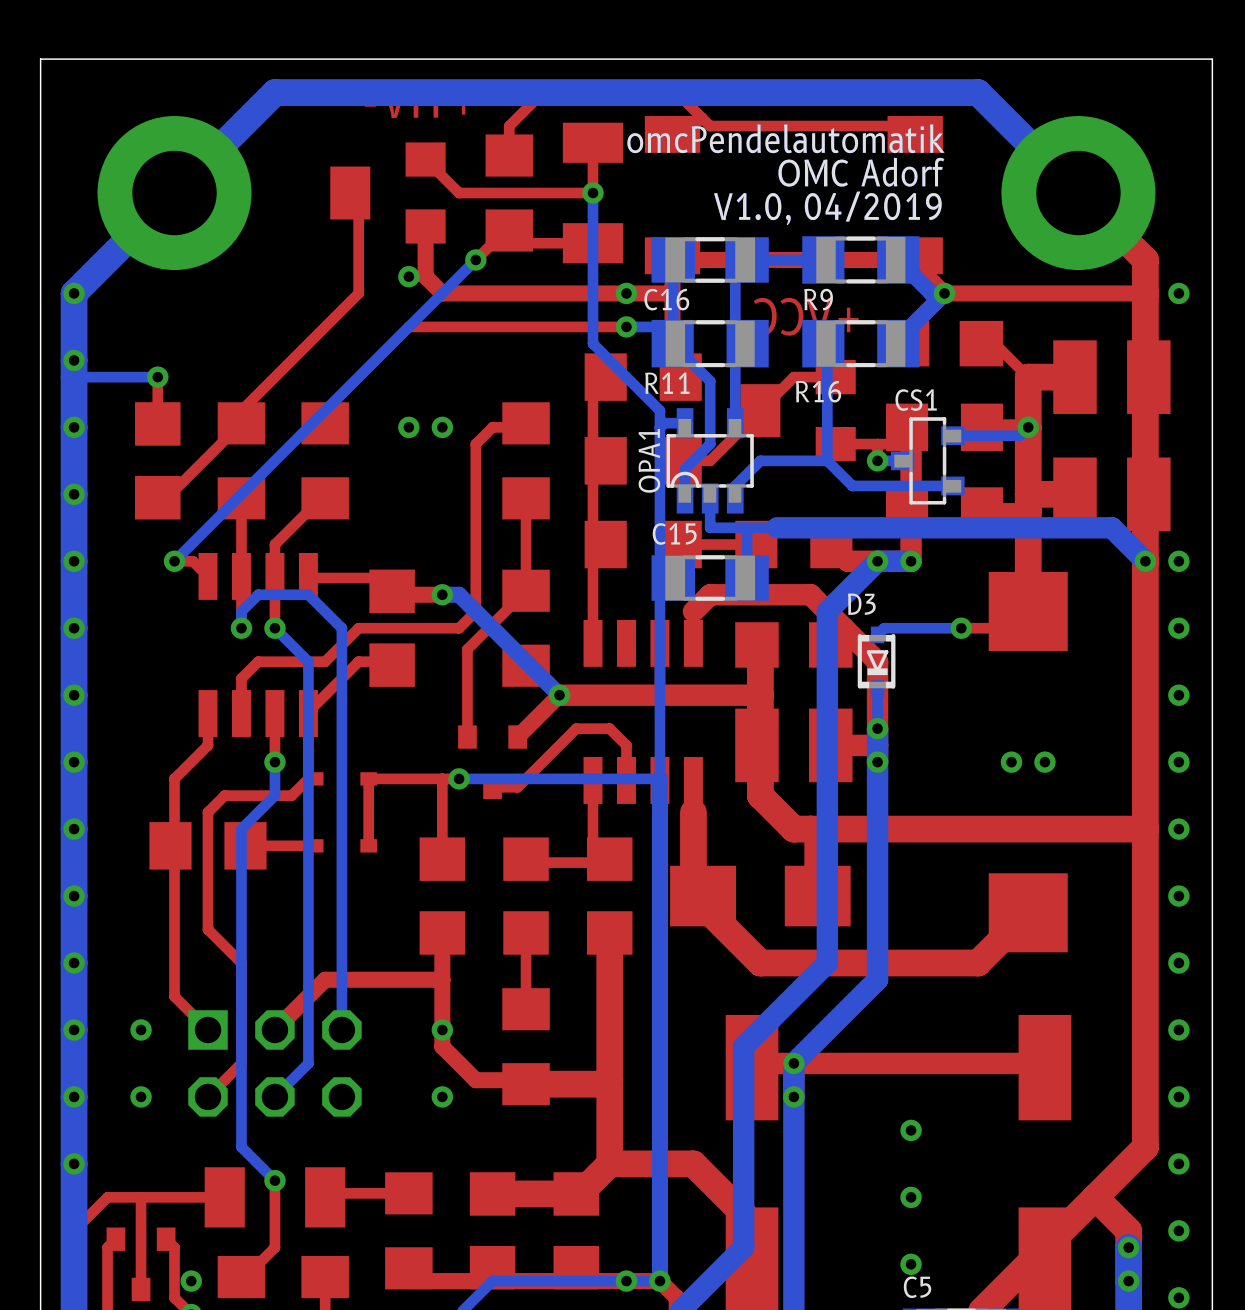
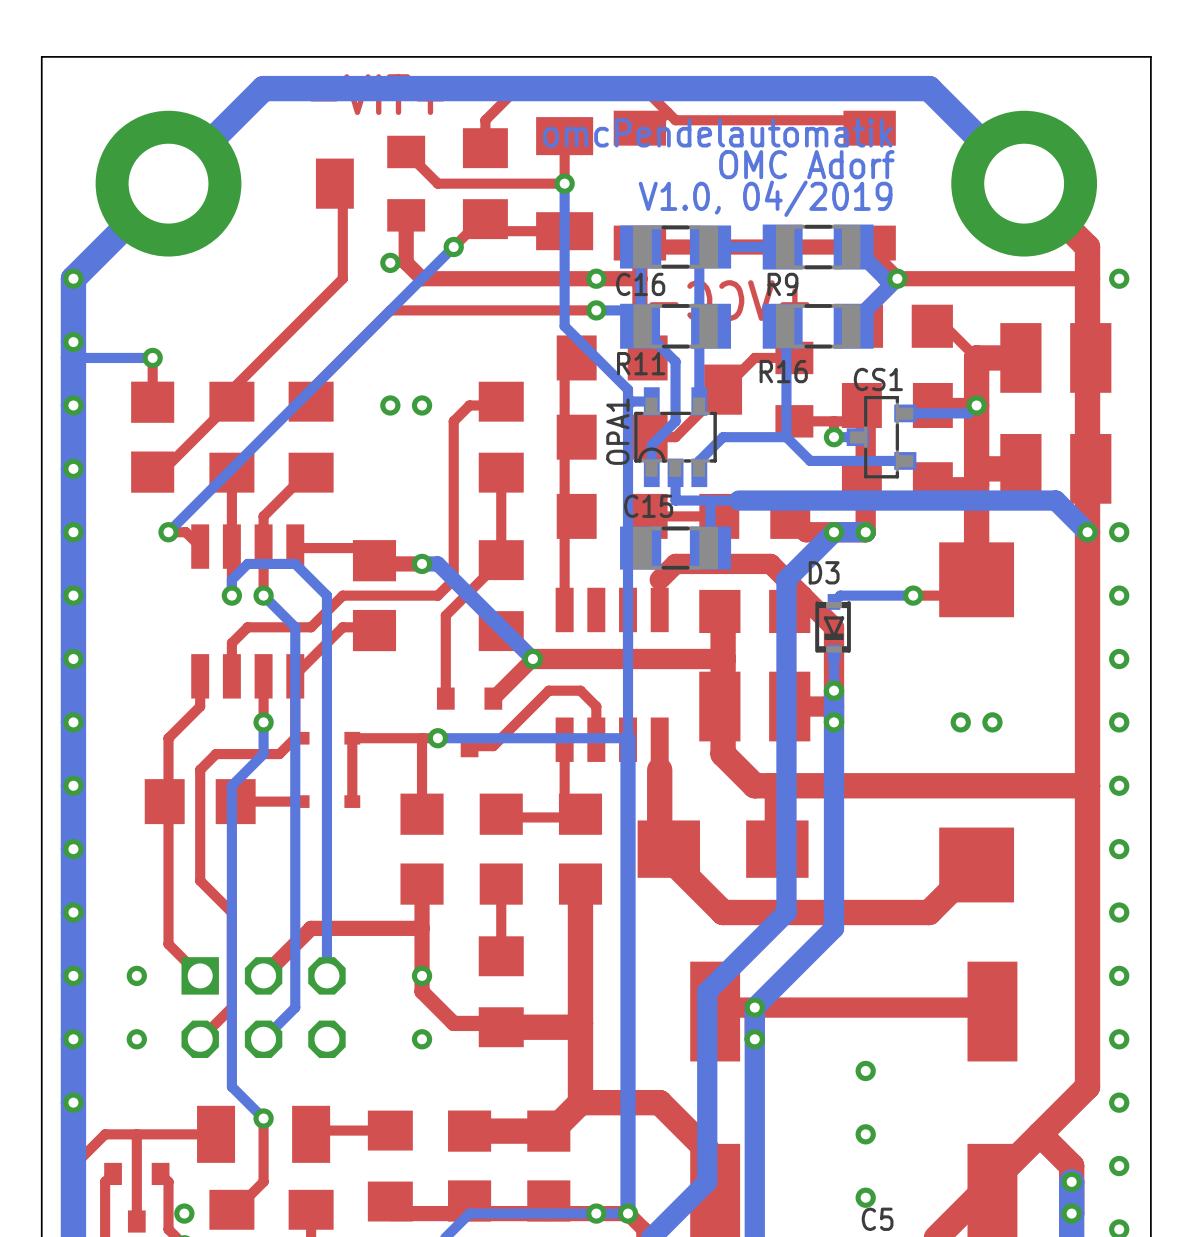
text: omcPendelautomatik (785, 138) -> none
text: OMC Adorf (861, 172) -> none
text: V1.0, 04/2019 (827, 208) -> none

